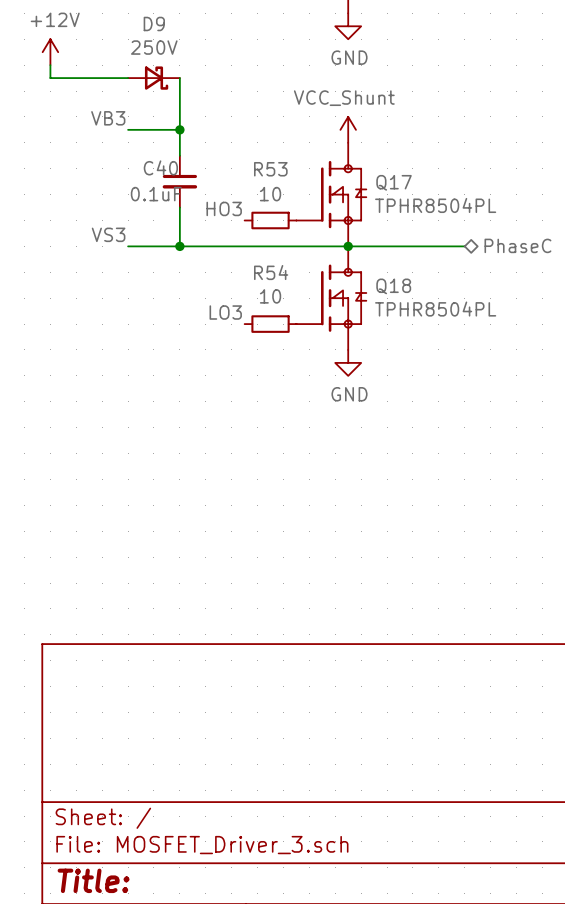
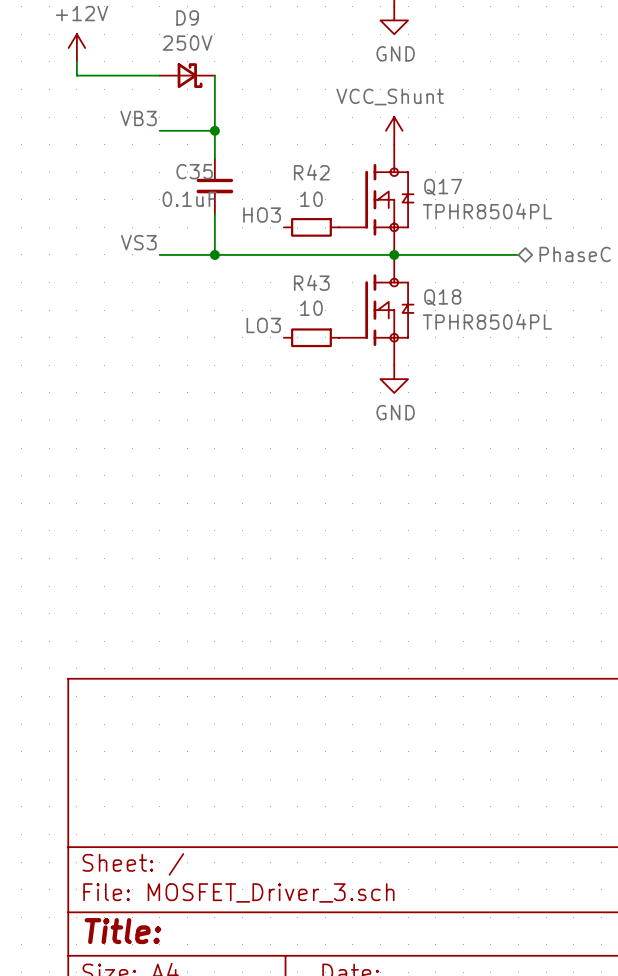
C40 name: C40 (160, 167) -> C35 (194, 171)
R53 name: R53 (270, 169) -> R42 (311, 172)
R54 name: R54 (271, 272) -> R43 (311, 282)

